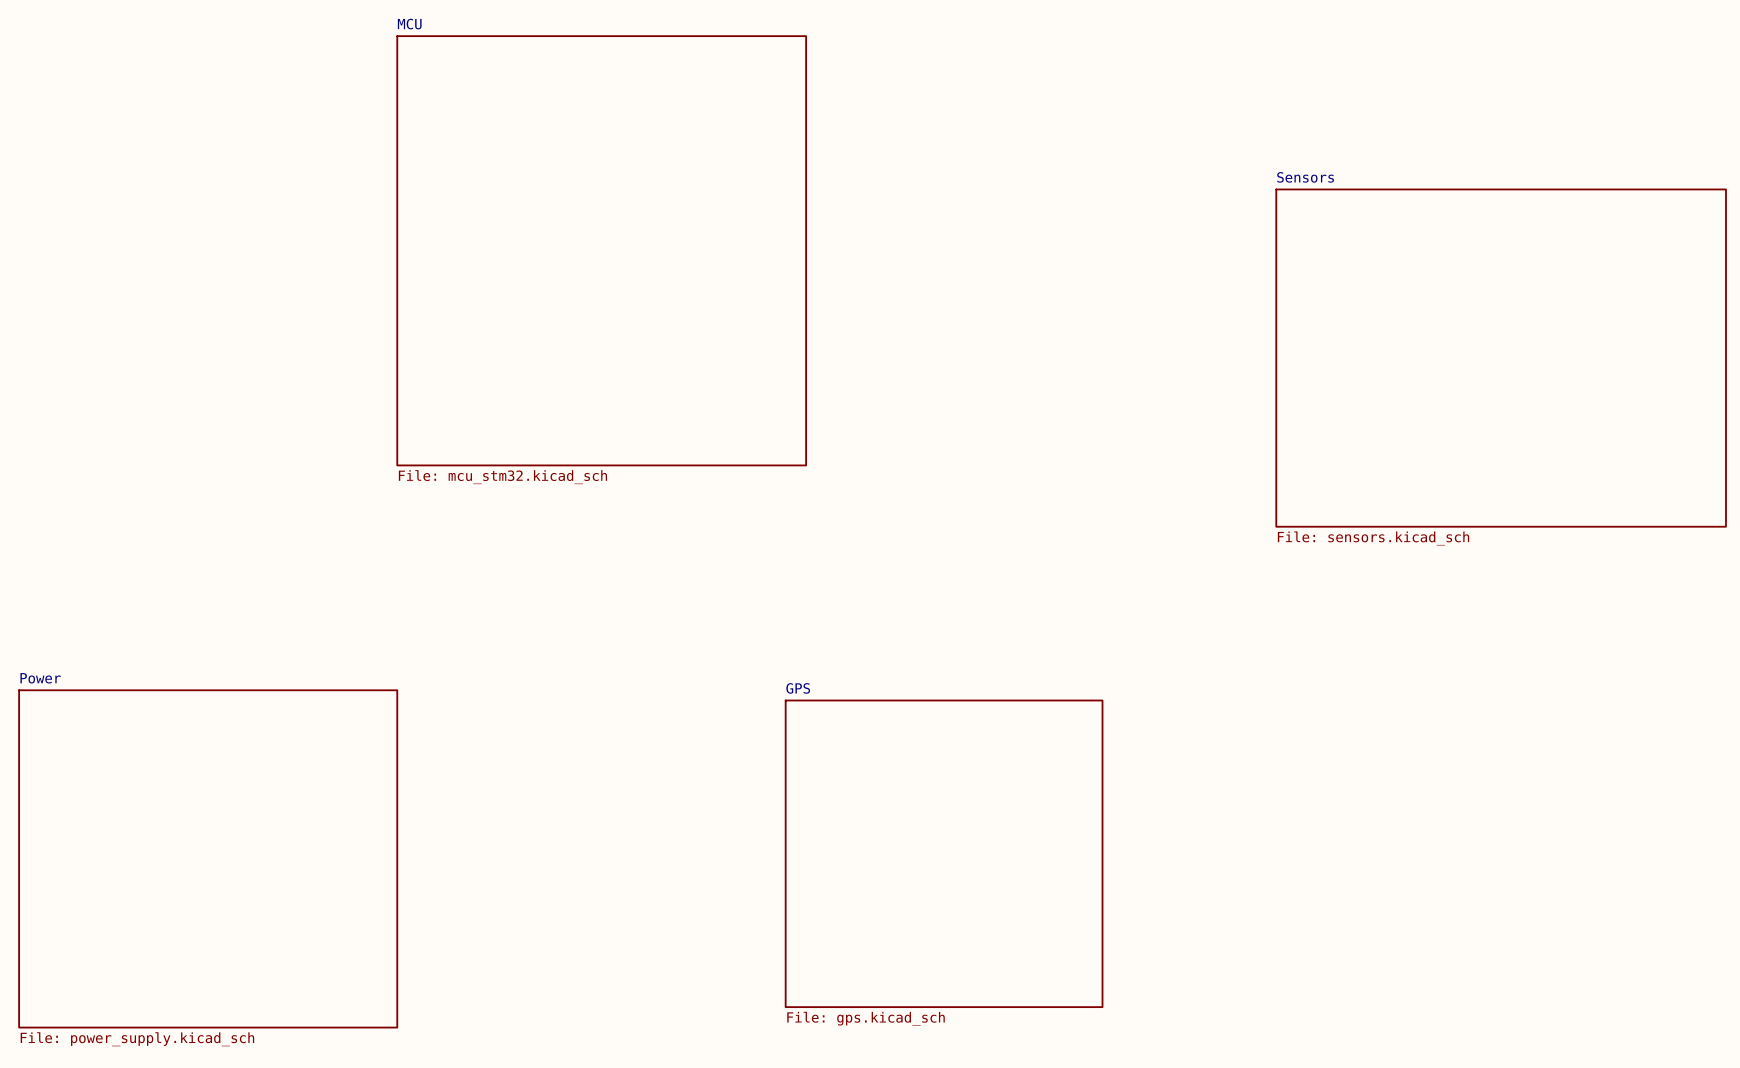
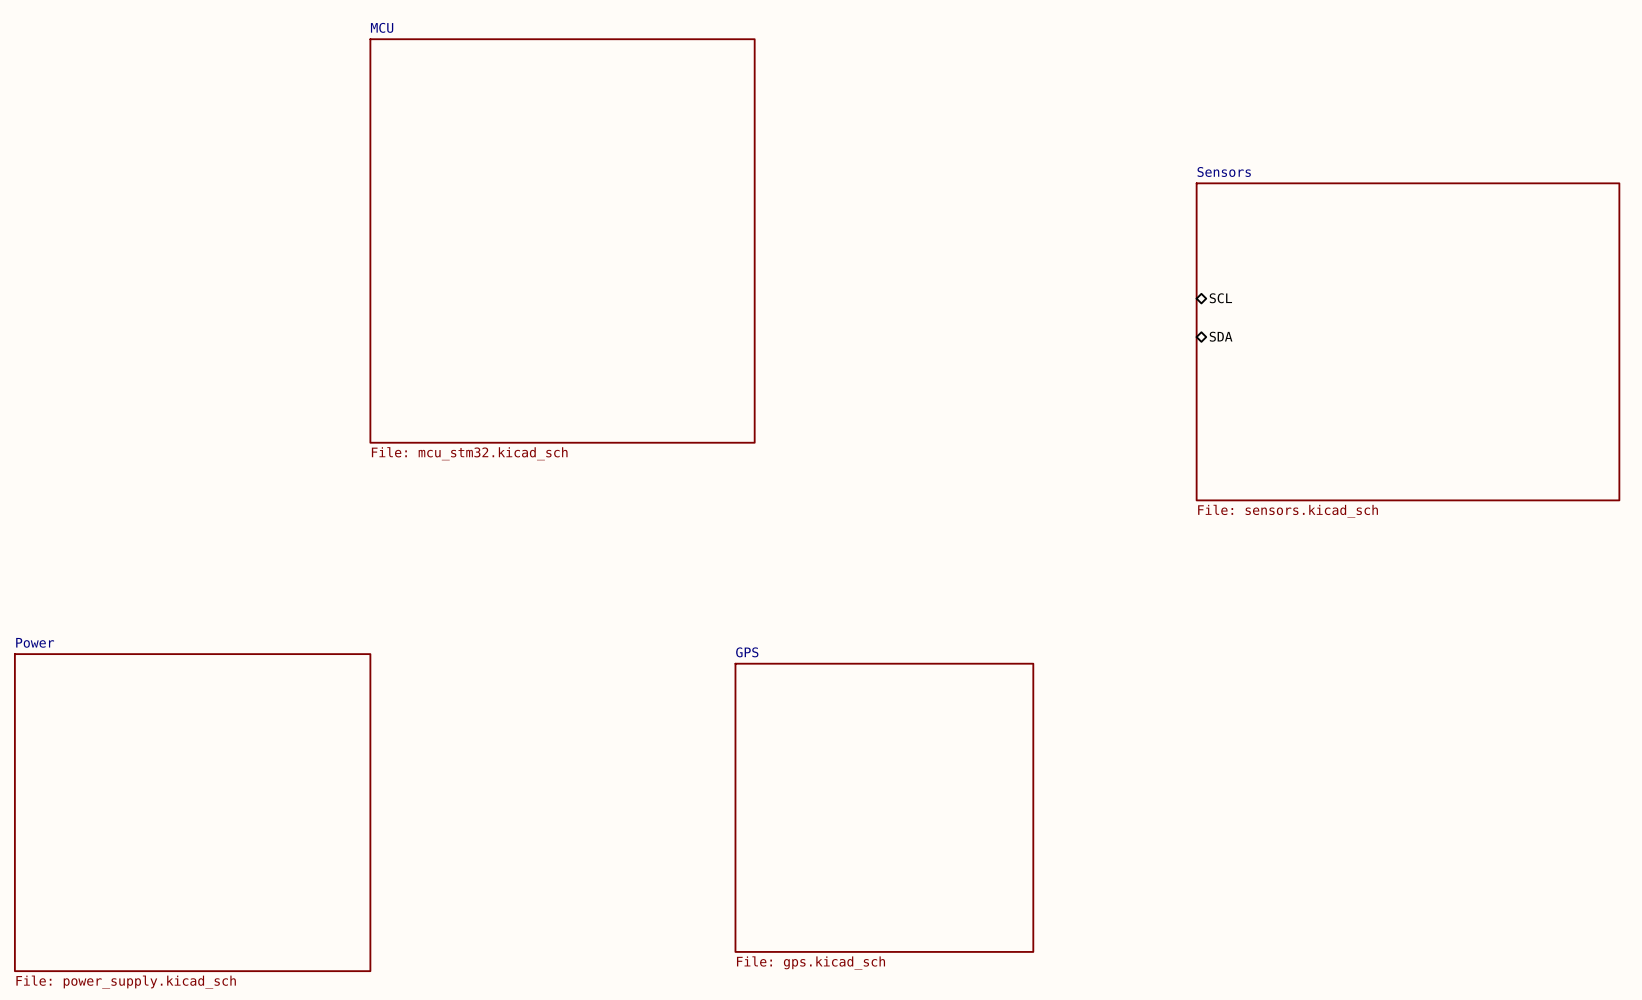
sheet pin: none -> SCL (1220, 298)
sheet pin: none -> SDA (1221, 336)

